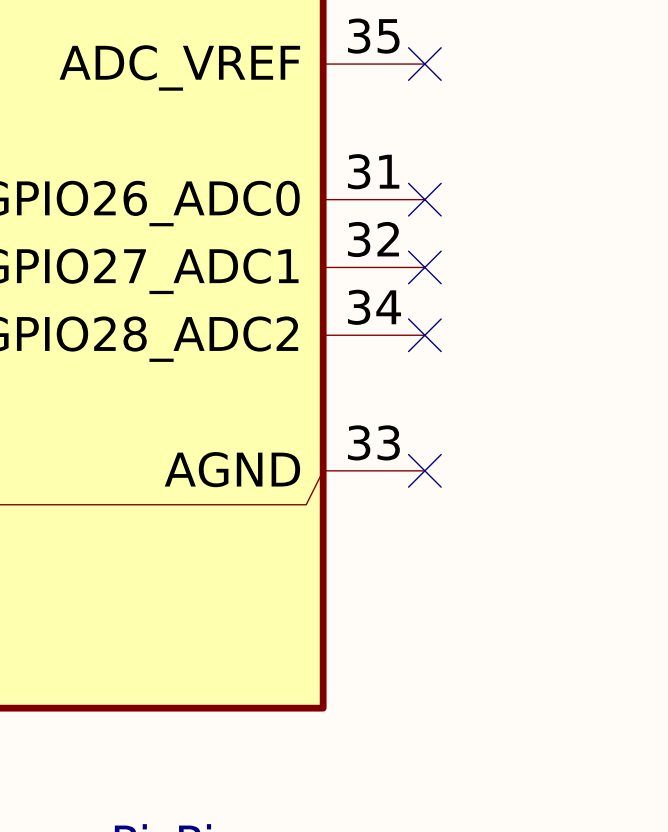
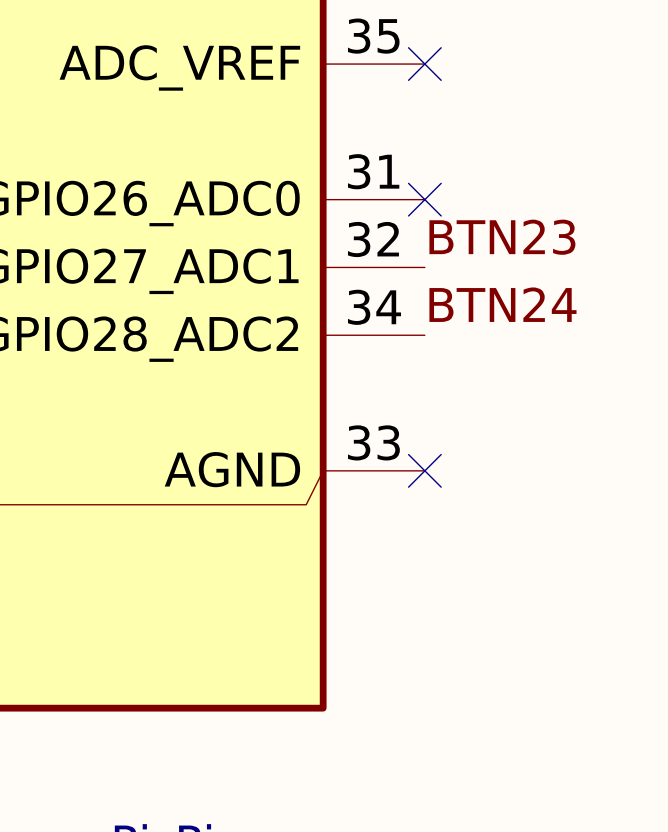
label: none -> BTN23 (502, 237)
no-connect mark: (424, 267) -> none
label: none -> BTN24 (502, 304)
no-connect mark: (424, 335) -> none

